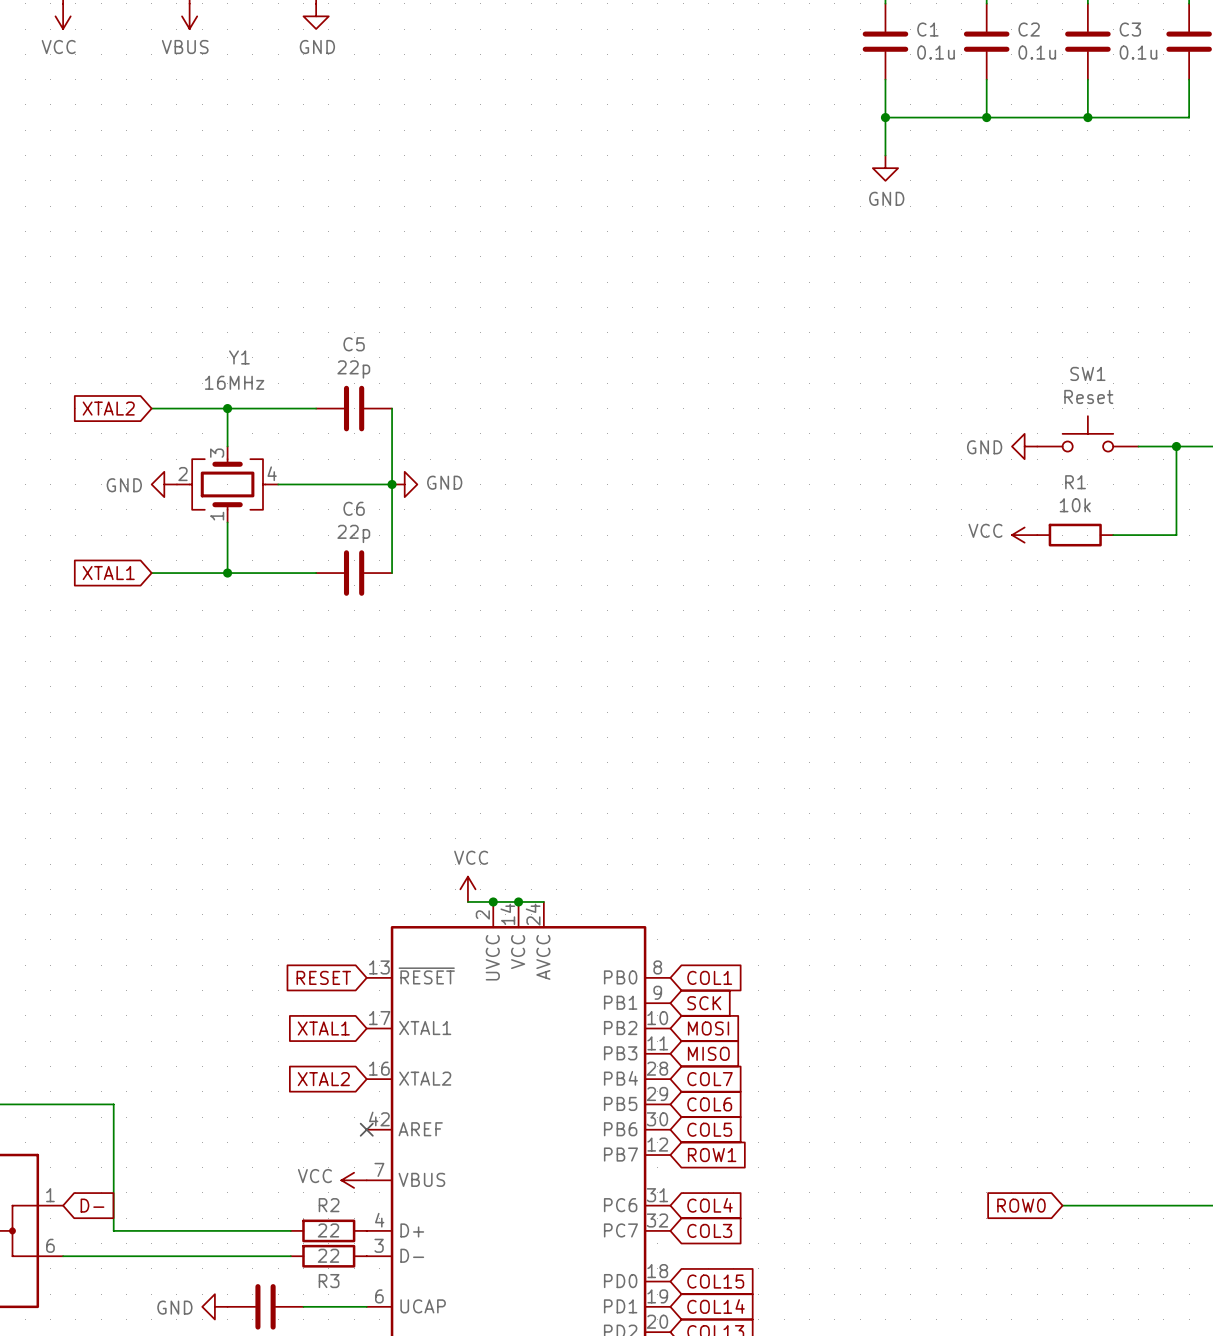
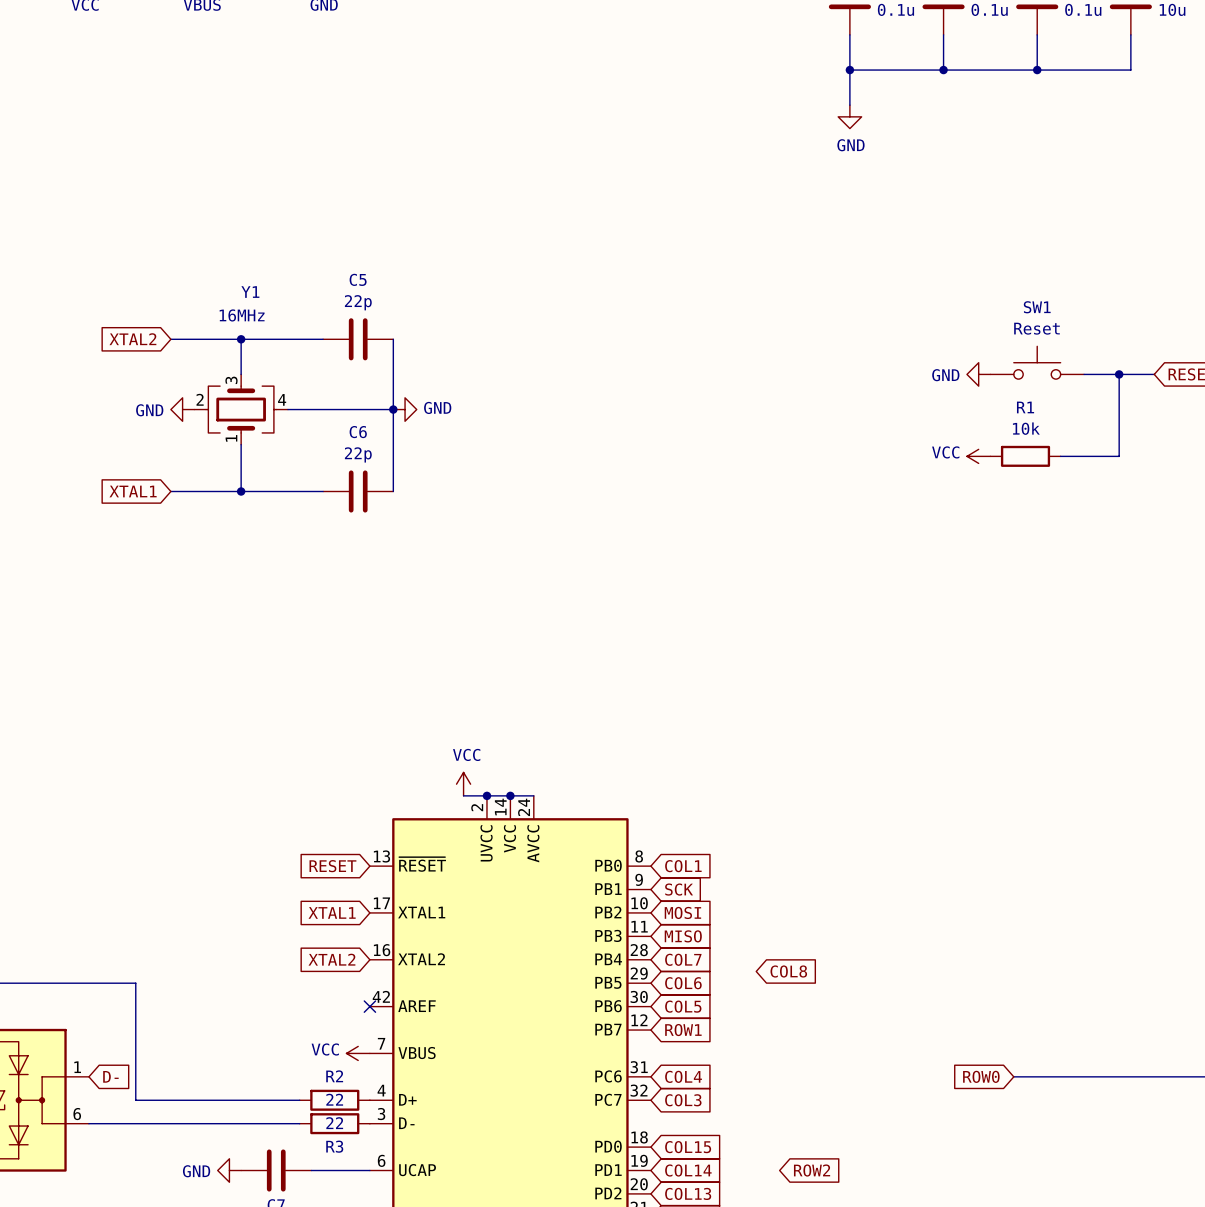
global label: none -> COL8 (788, 971)
global label: none -> ROW2 (812, 1170)

